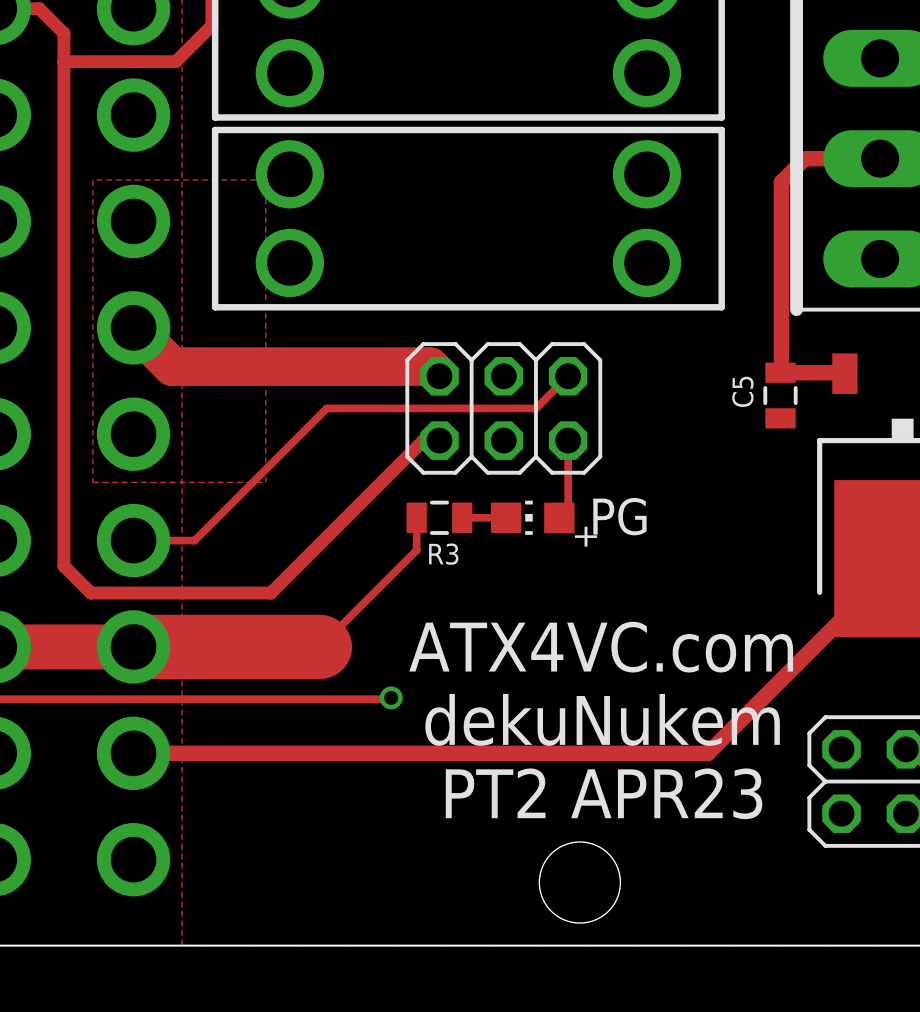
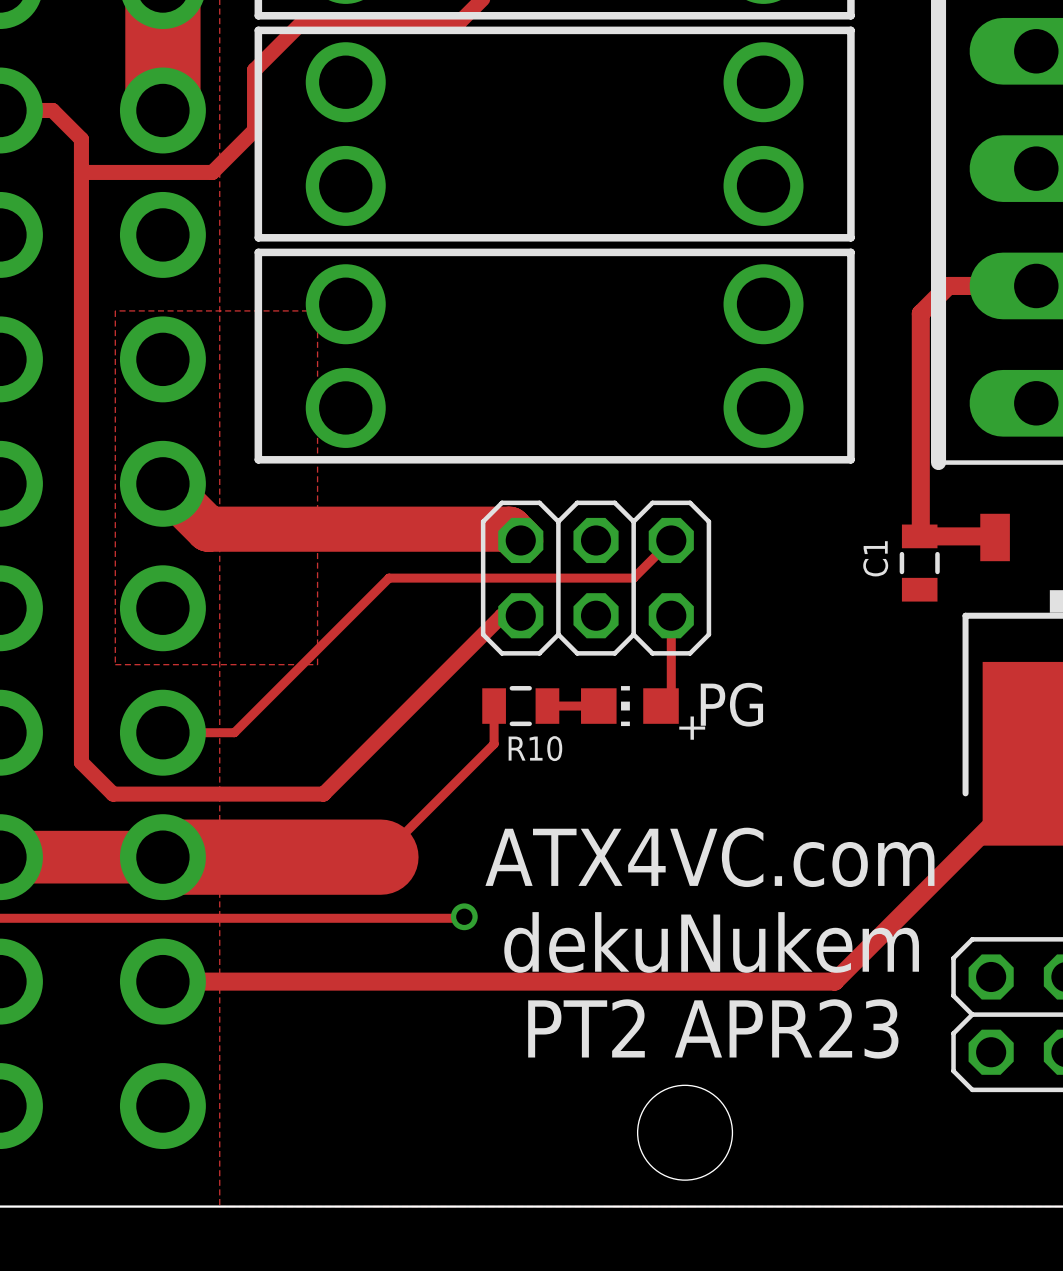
C5 name: C5 (742, 391) -> C1 (875, 558)
R3 name: R3 (443, 554) -> R10 (535, 748)

